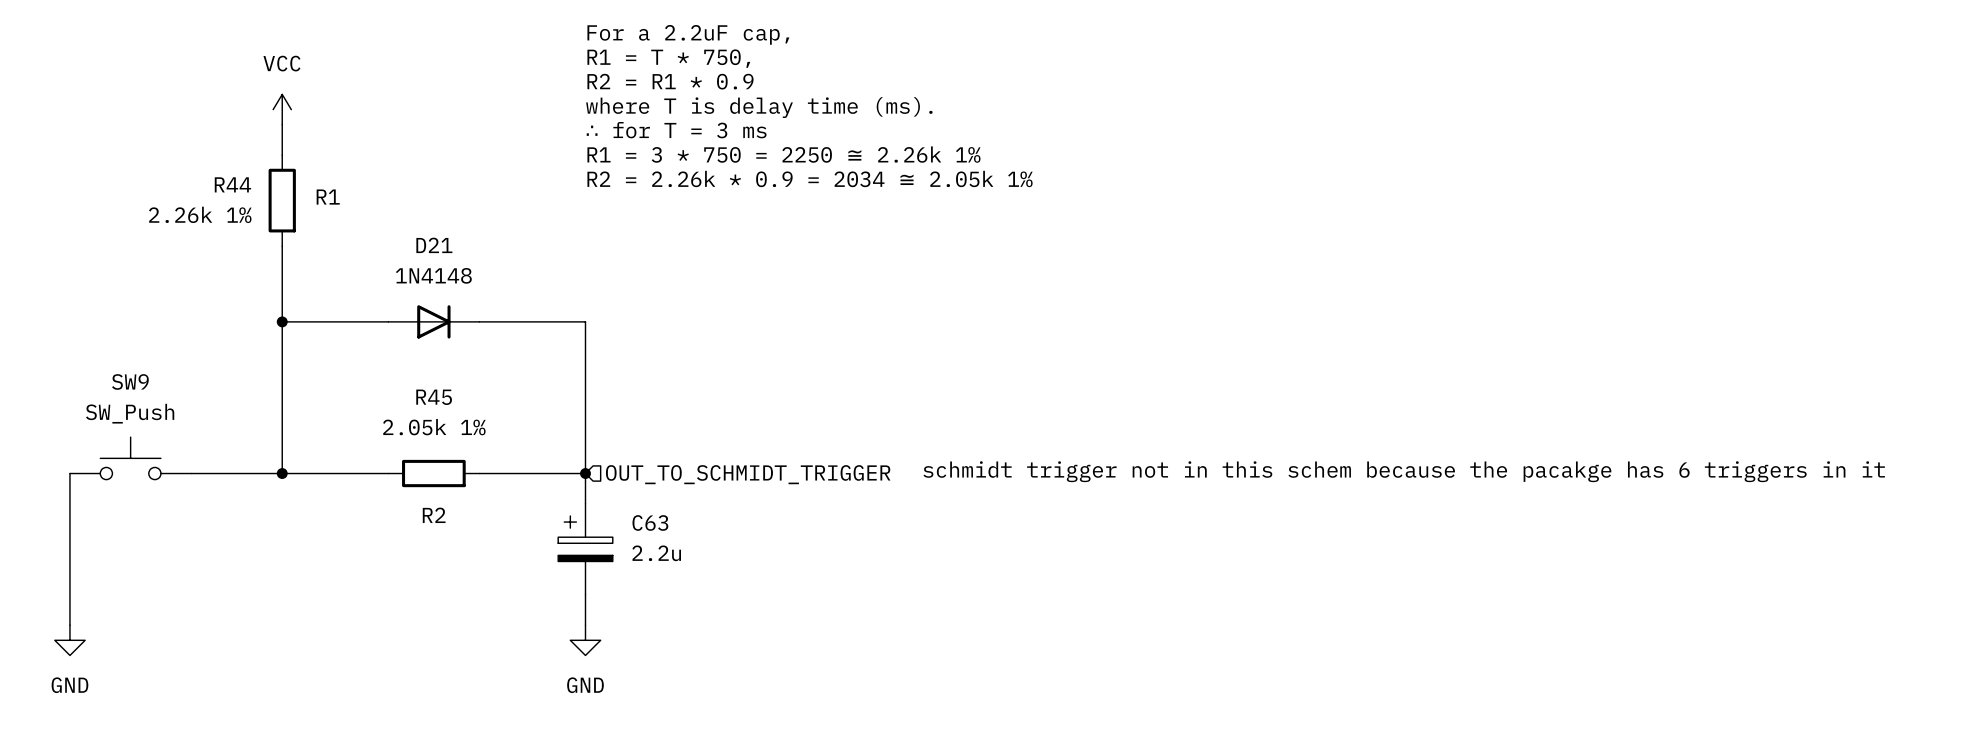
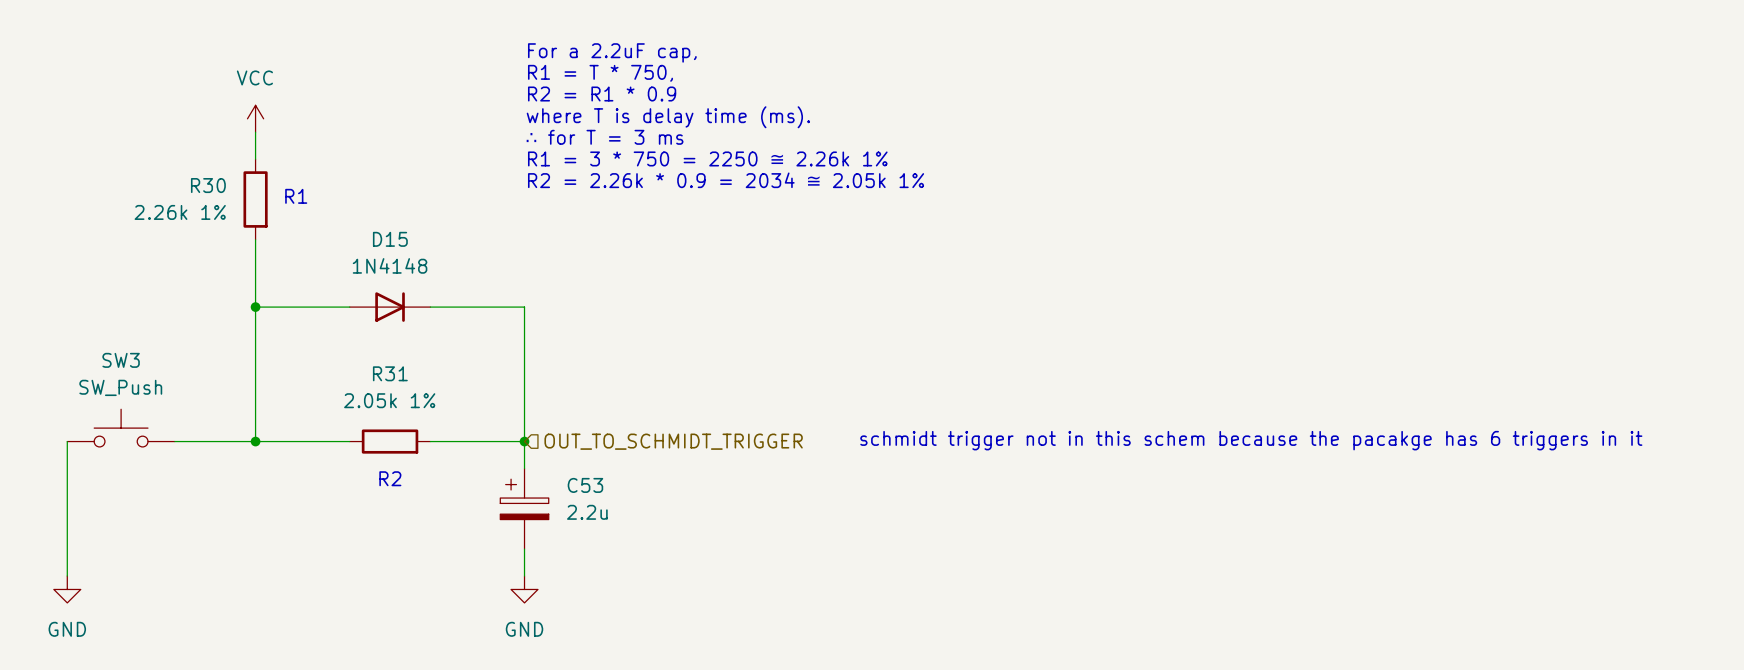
R44 name: R44 (232, 184) -> R30 (208, 185)
D21 name: D21 (434, 245) -> D15 (390, 239)
SW9 name: SW9 (130, 381) -> SW3 (121, 360)
R45 name: R45 (434, 397) -> R31 (390, 373)
C63 name: C63 (650, 522) -> C53 (585, 485)

